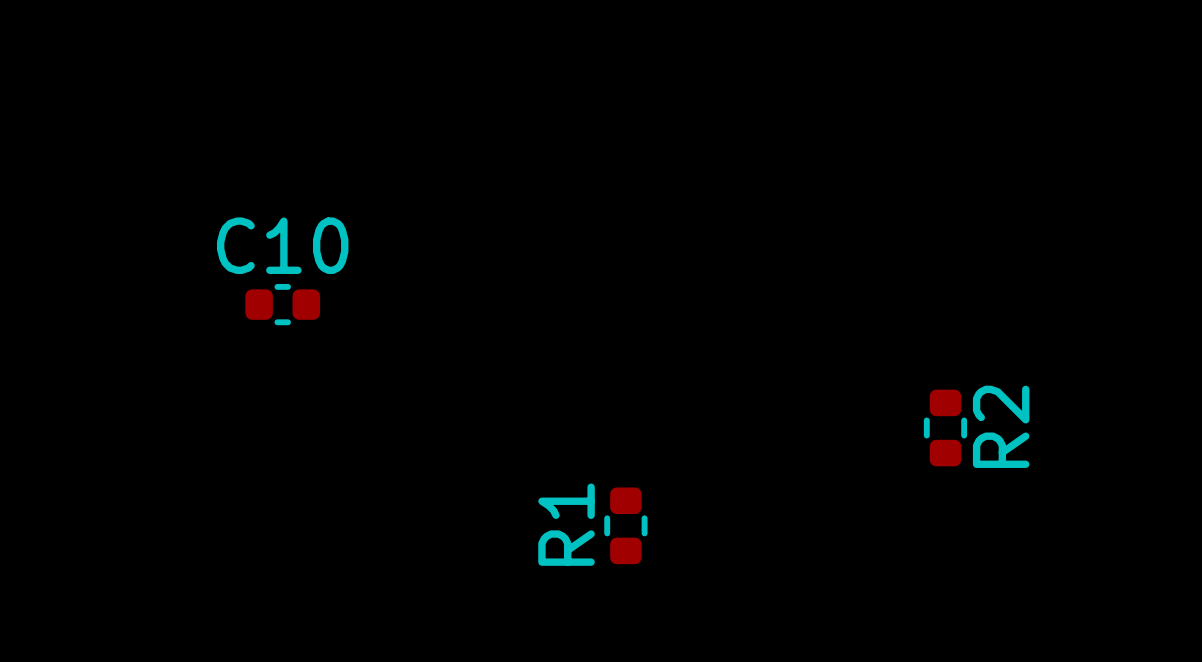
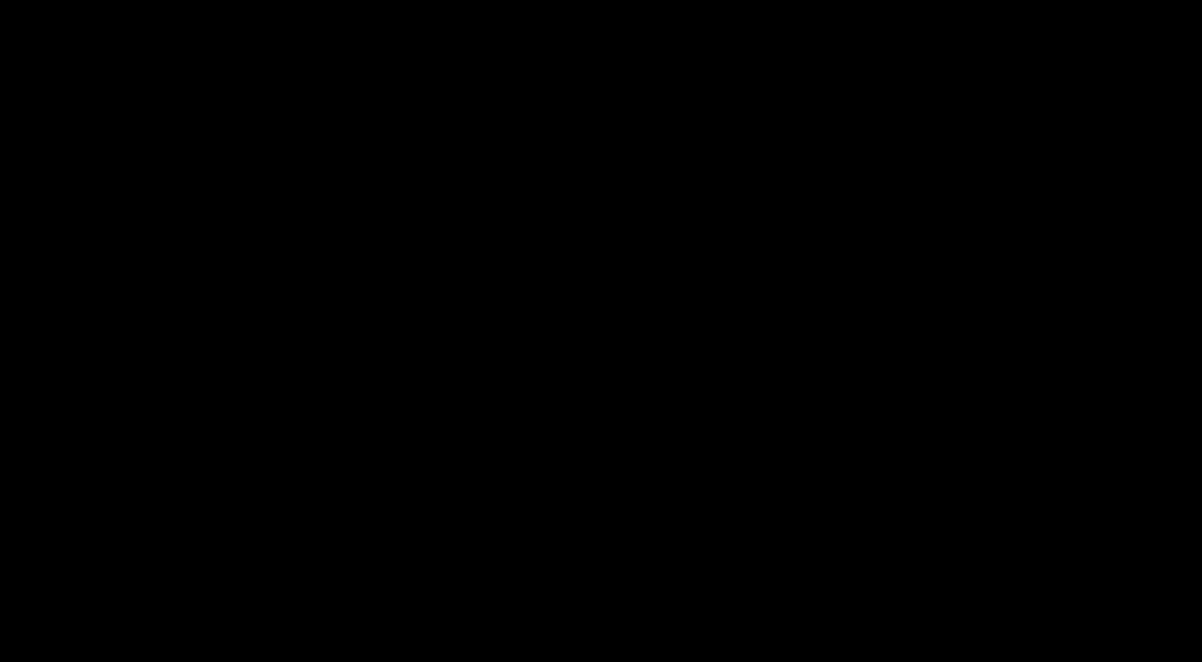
C10: (282, 304) -> none
R2: (945, 427) -> none
R1: (625, 525) -> none

